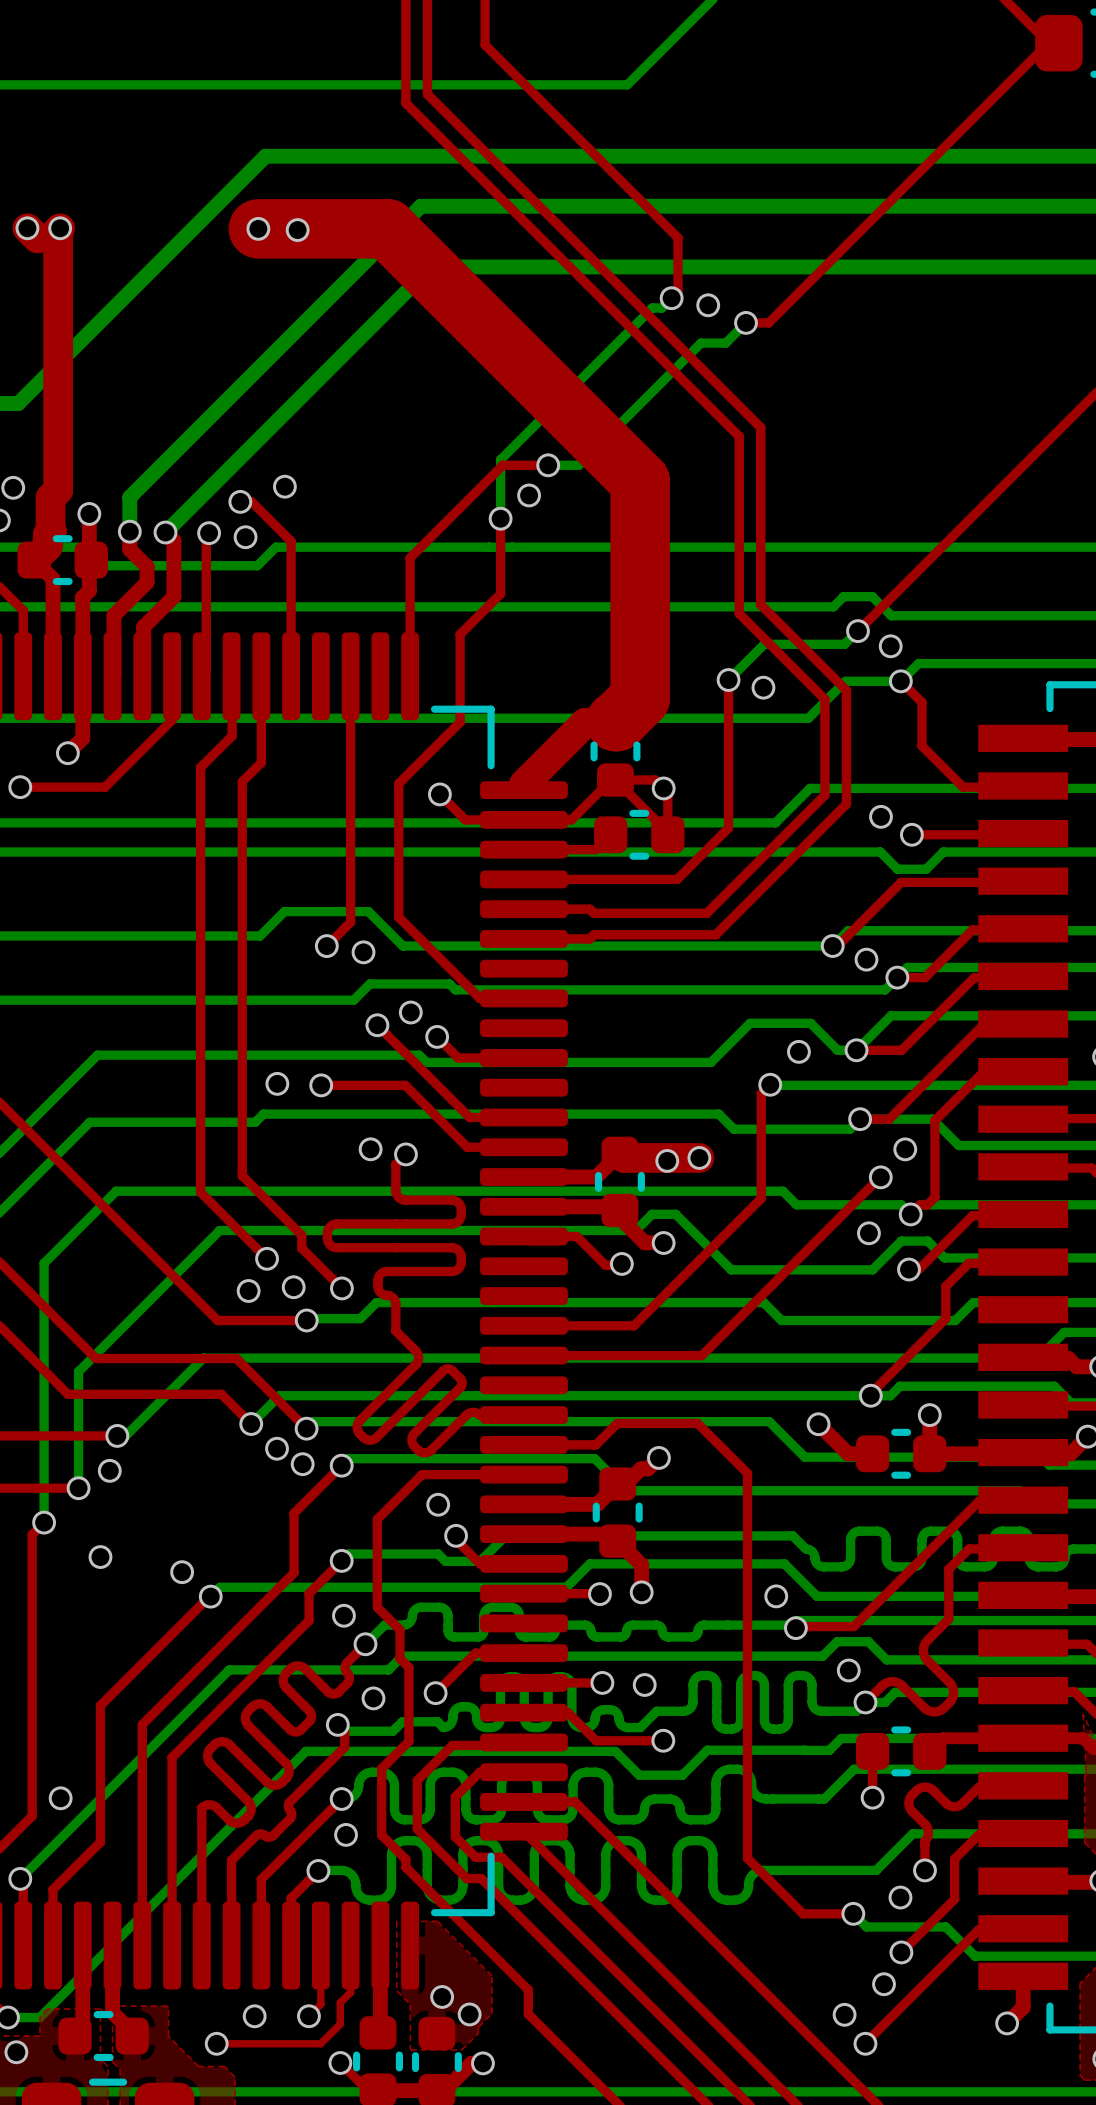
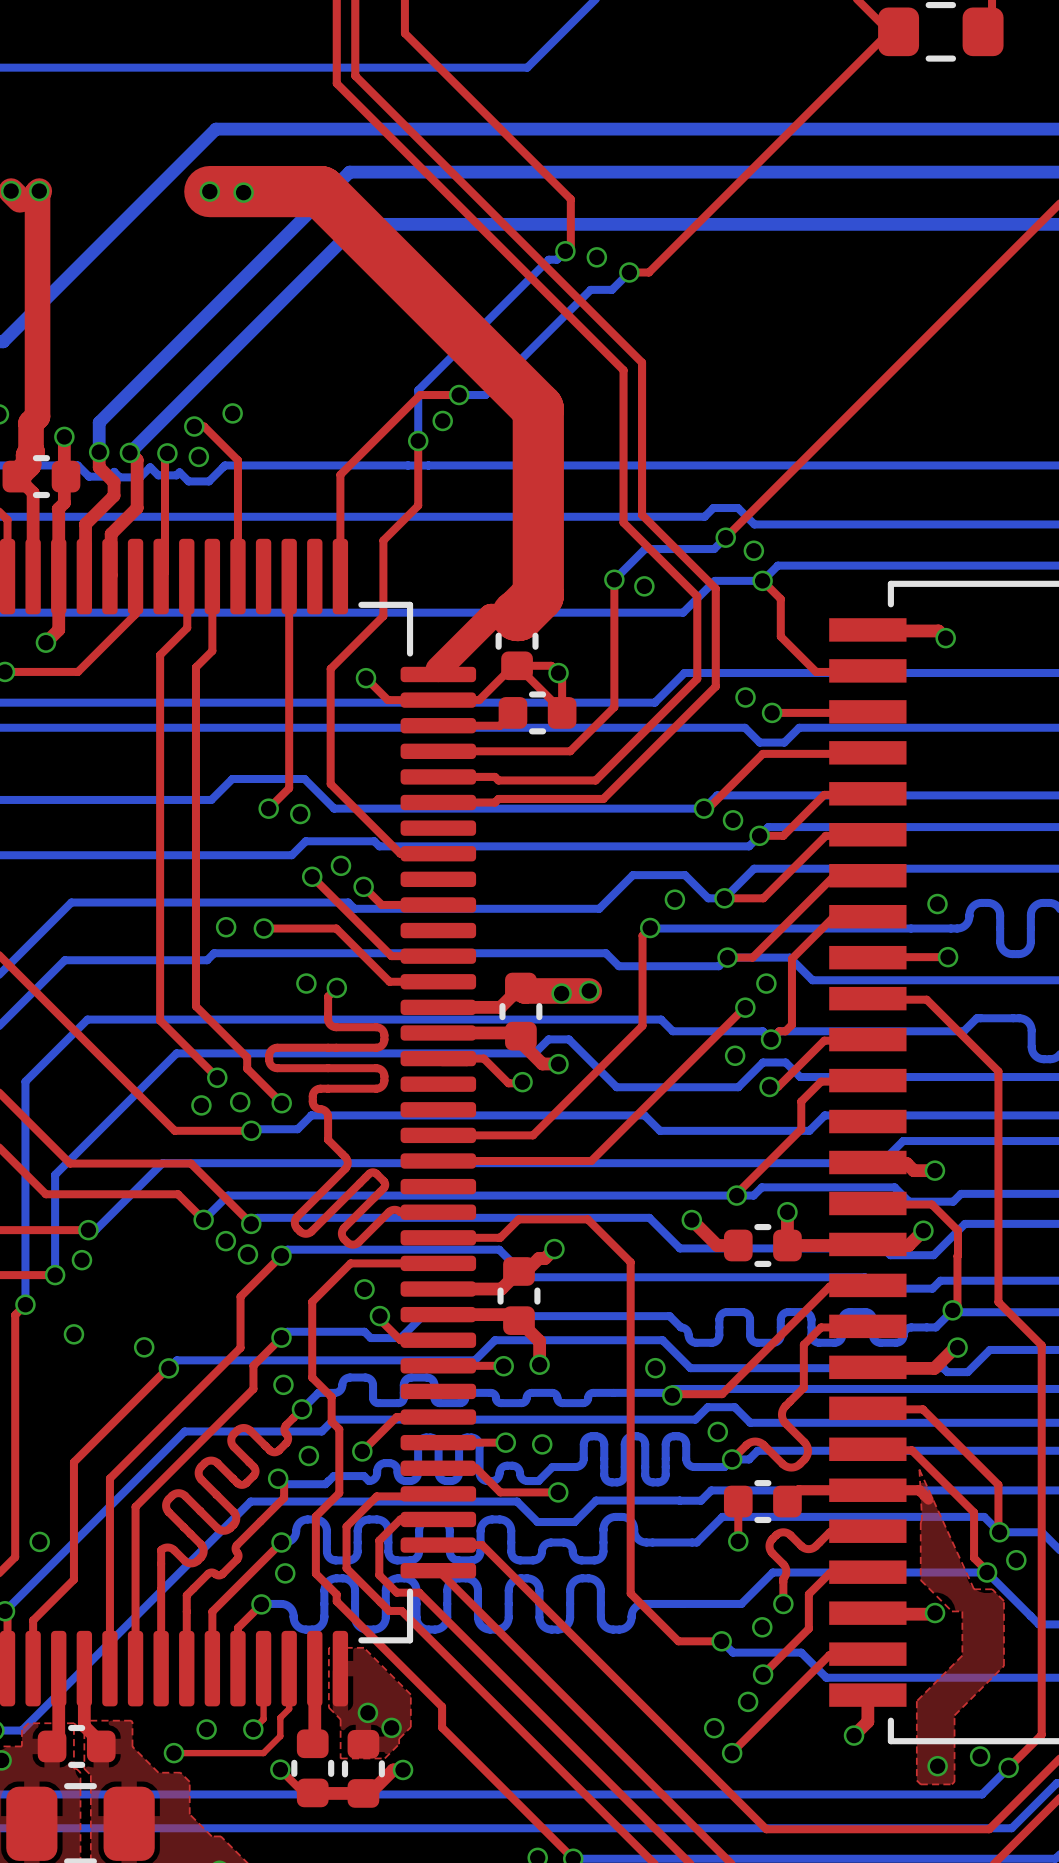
bottom track: (88, 547) (106, 565) (233, 565) -> (63, 465) (77, 465) (89, 476) (109, 476) (114, 471) (119, 477) (140, 477) (150, 467) (158, 475) (176, 475) (179, 472) (188, 481)

